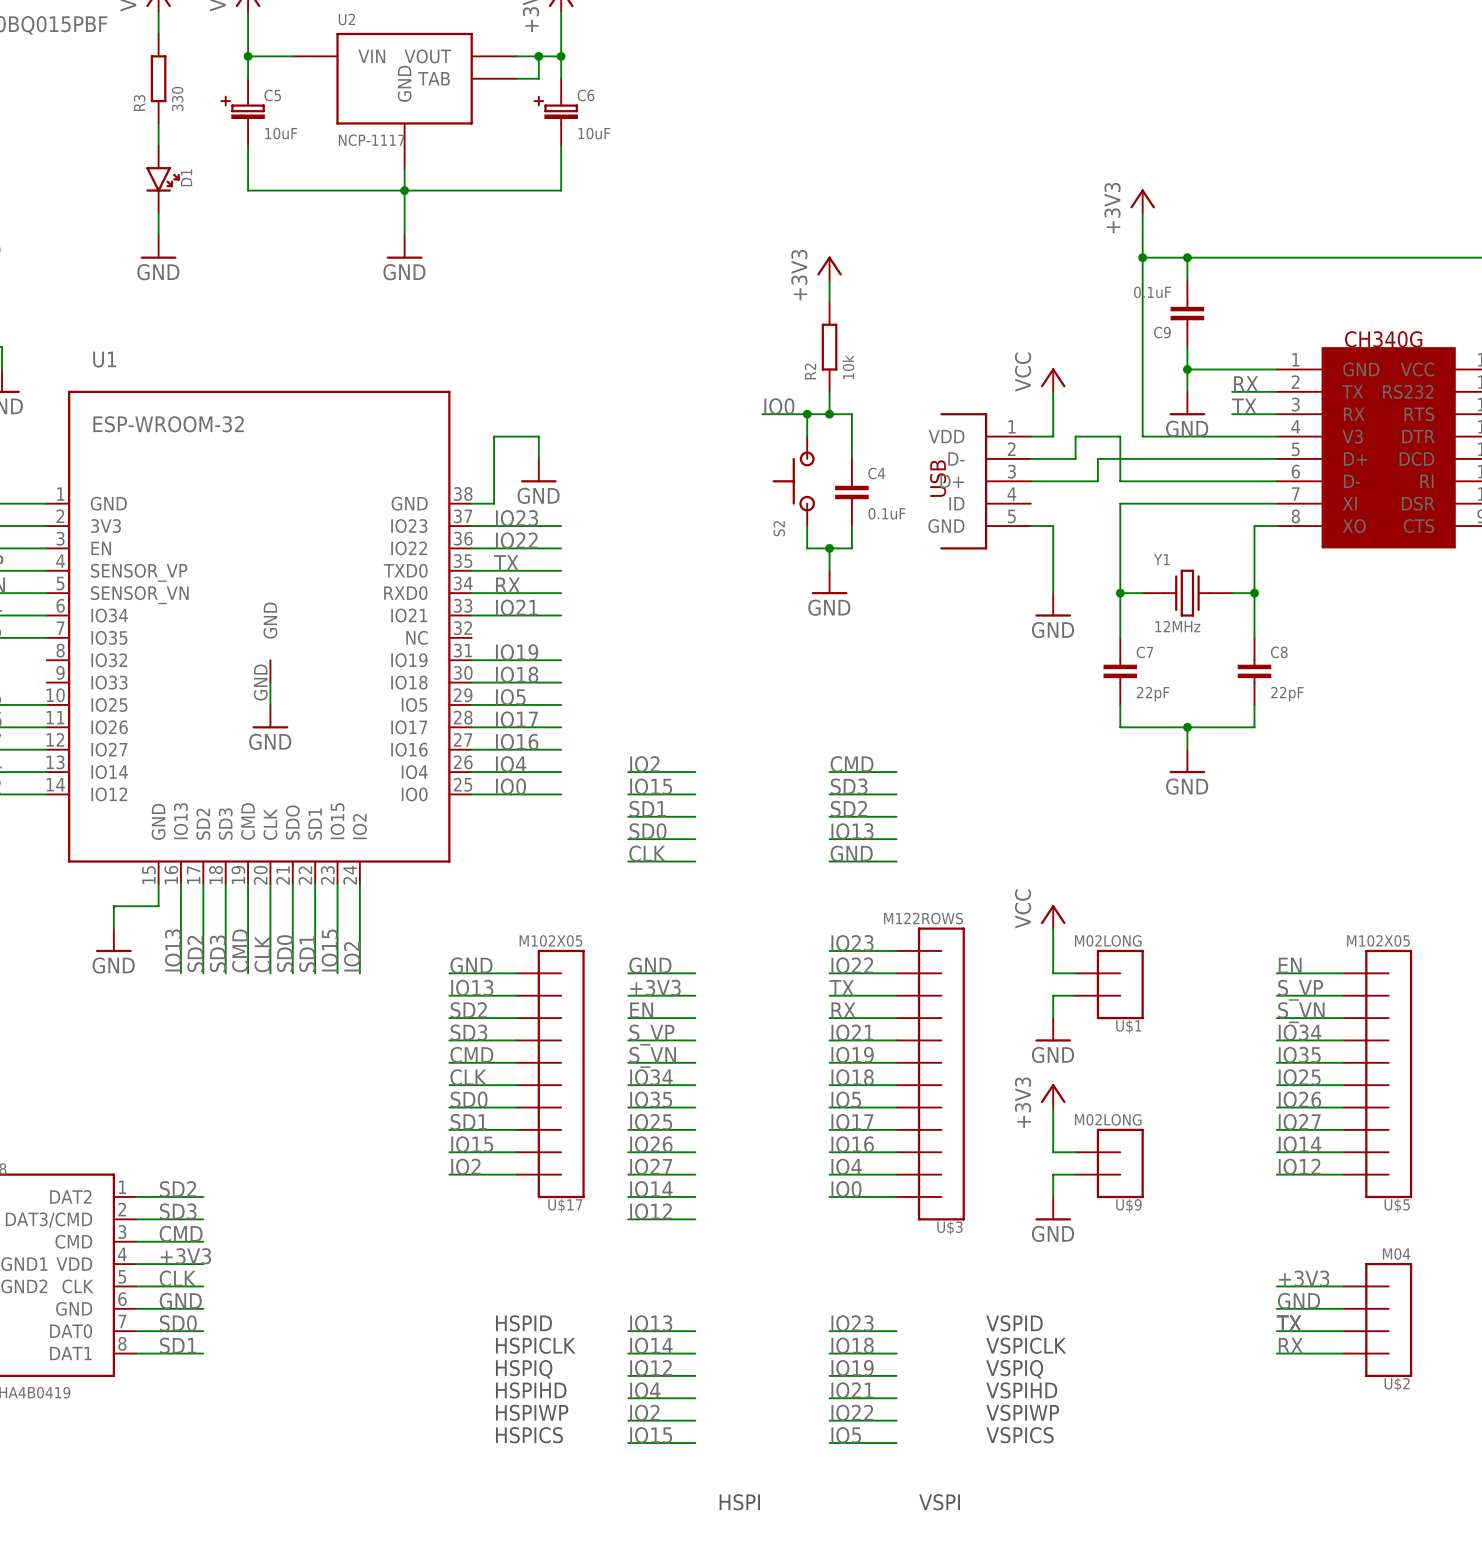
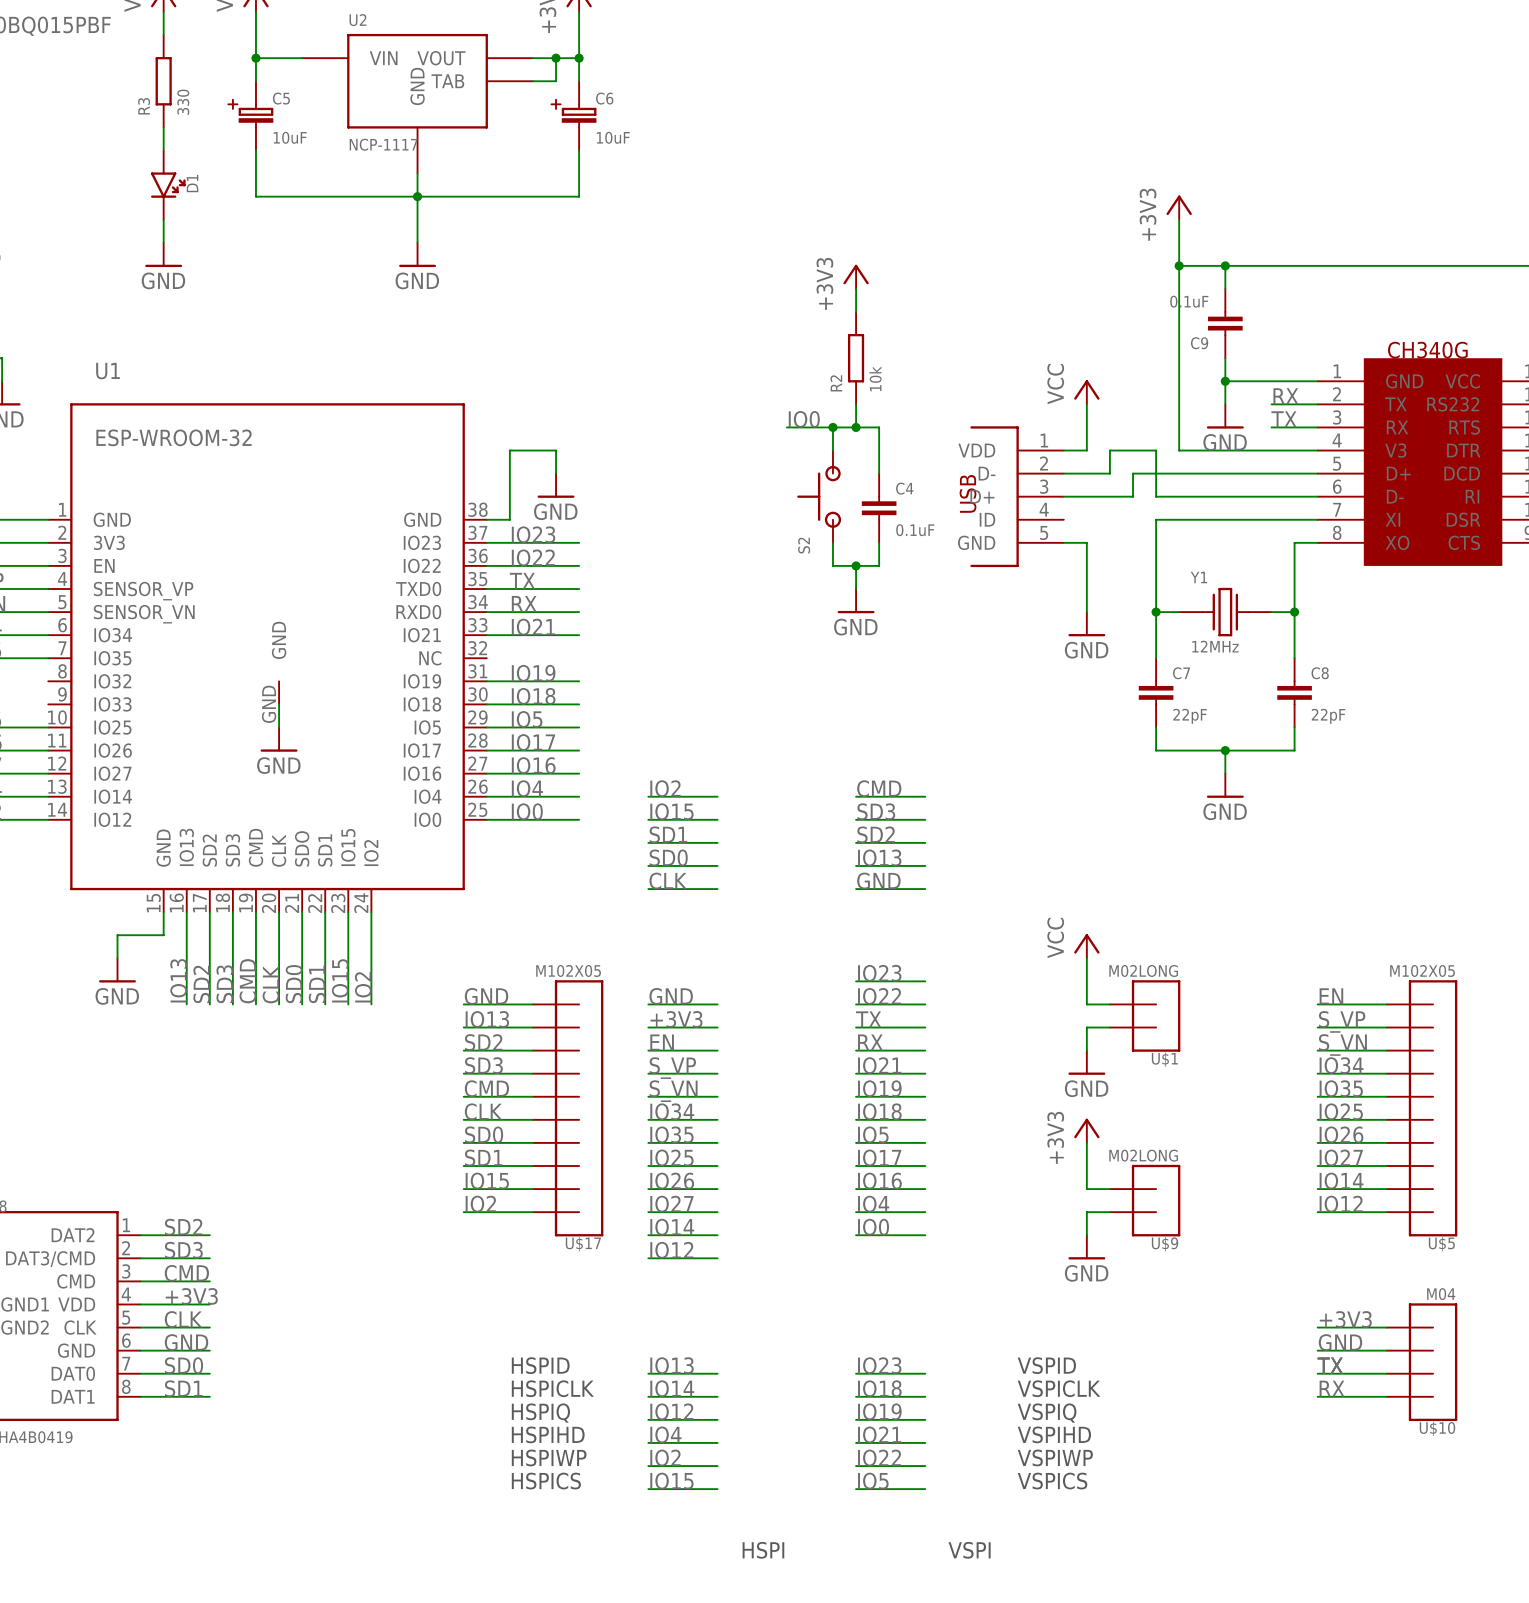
U$3: M122ROWS (930, 1073) -> none
U$2 name: U$2 (1397, 1384) -> U$10 (1437, 1428)

